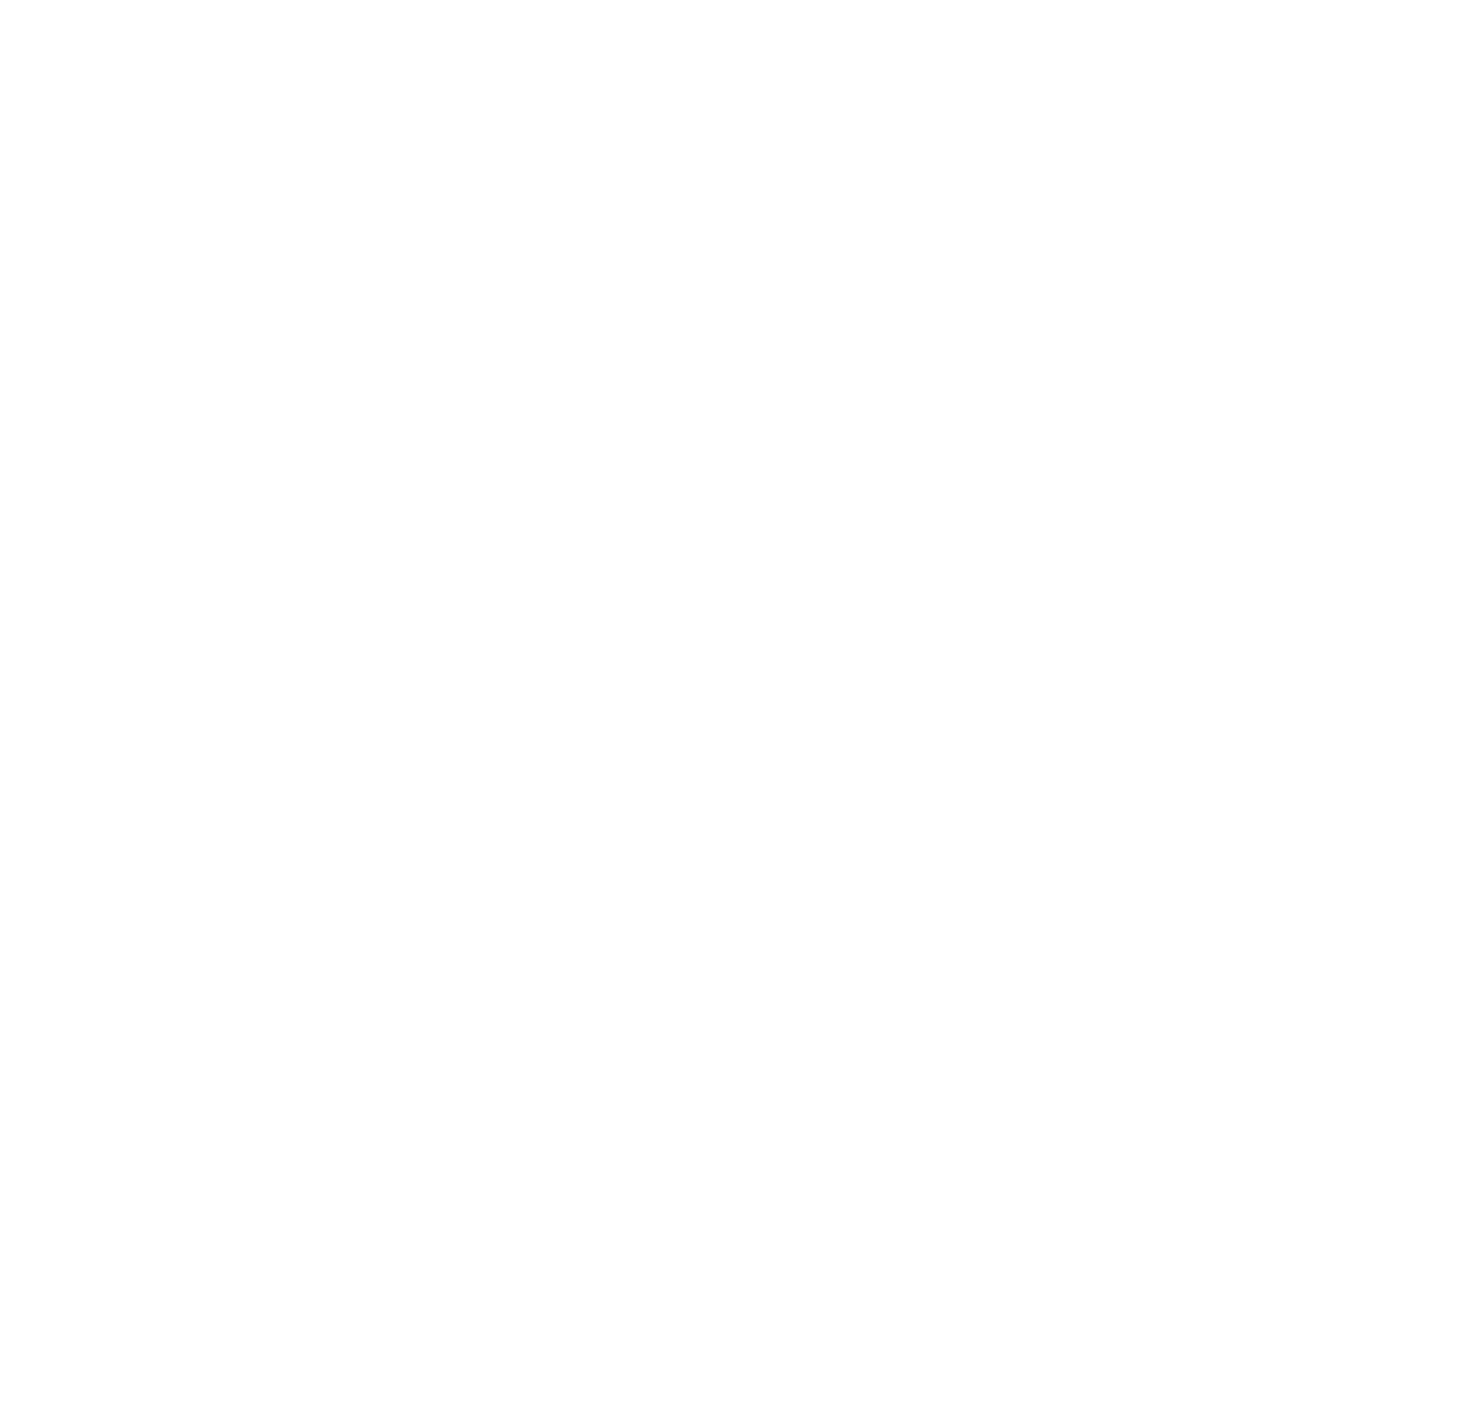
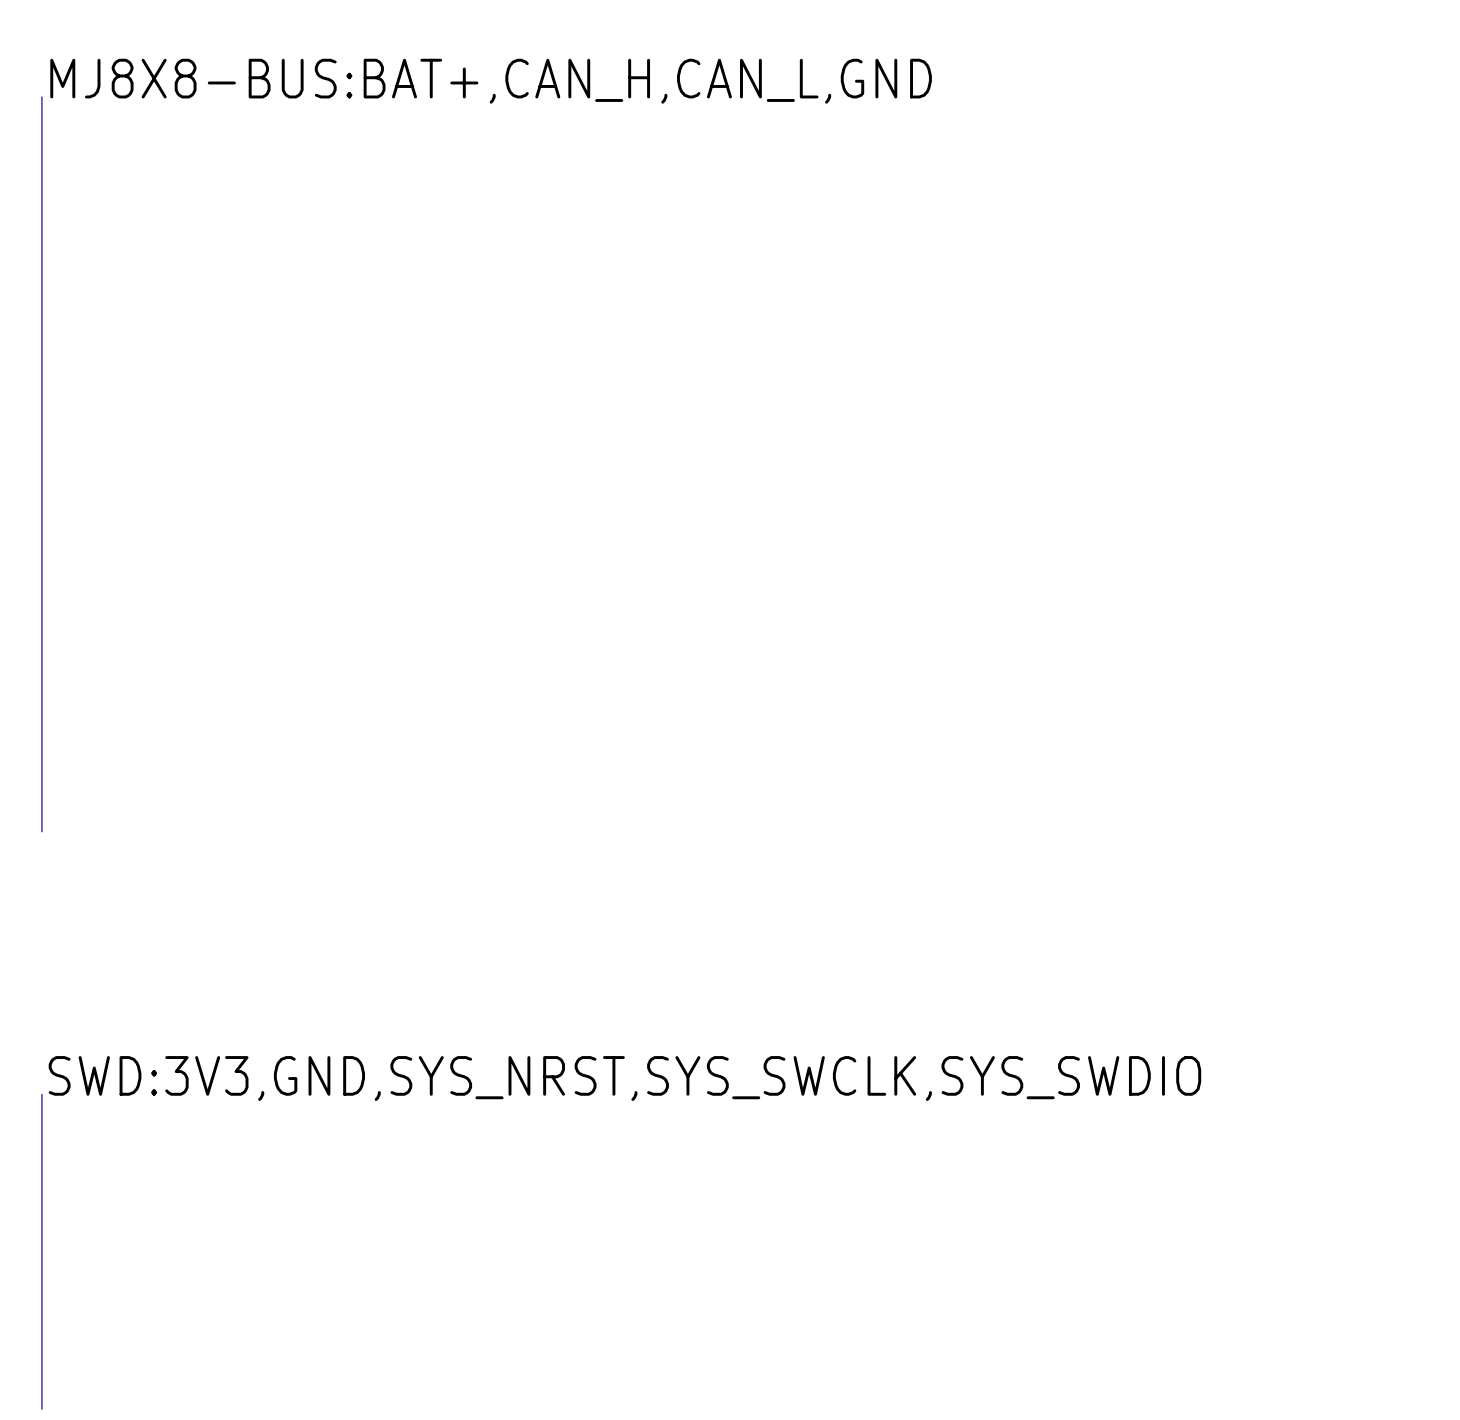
label: none -> MJ8X8-BUS:BAT+,CAN_H,CAN_L,GND (491, 81)
bus: none -> (41, 96) (41, 831)
label: none -> SWD:3V3,GND,SYS_NRST,SYS_SWCLK,SYS_SWDIO (624, 1078)
bus: none -> (41, 1094) (41, 1409)

